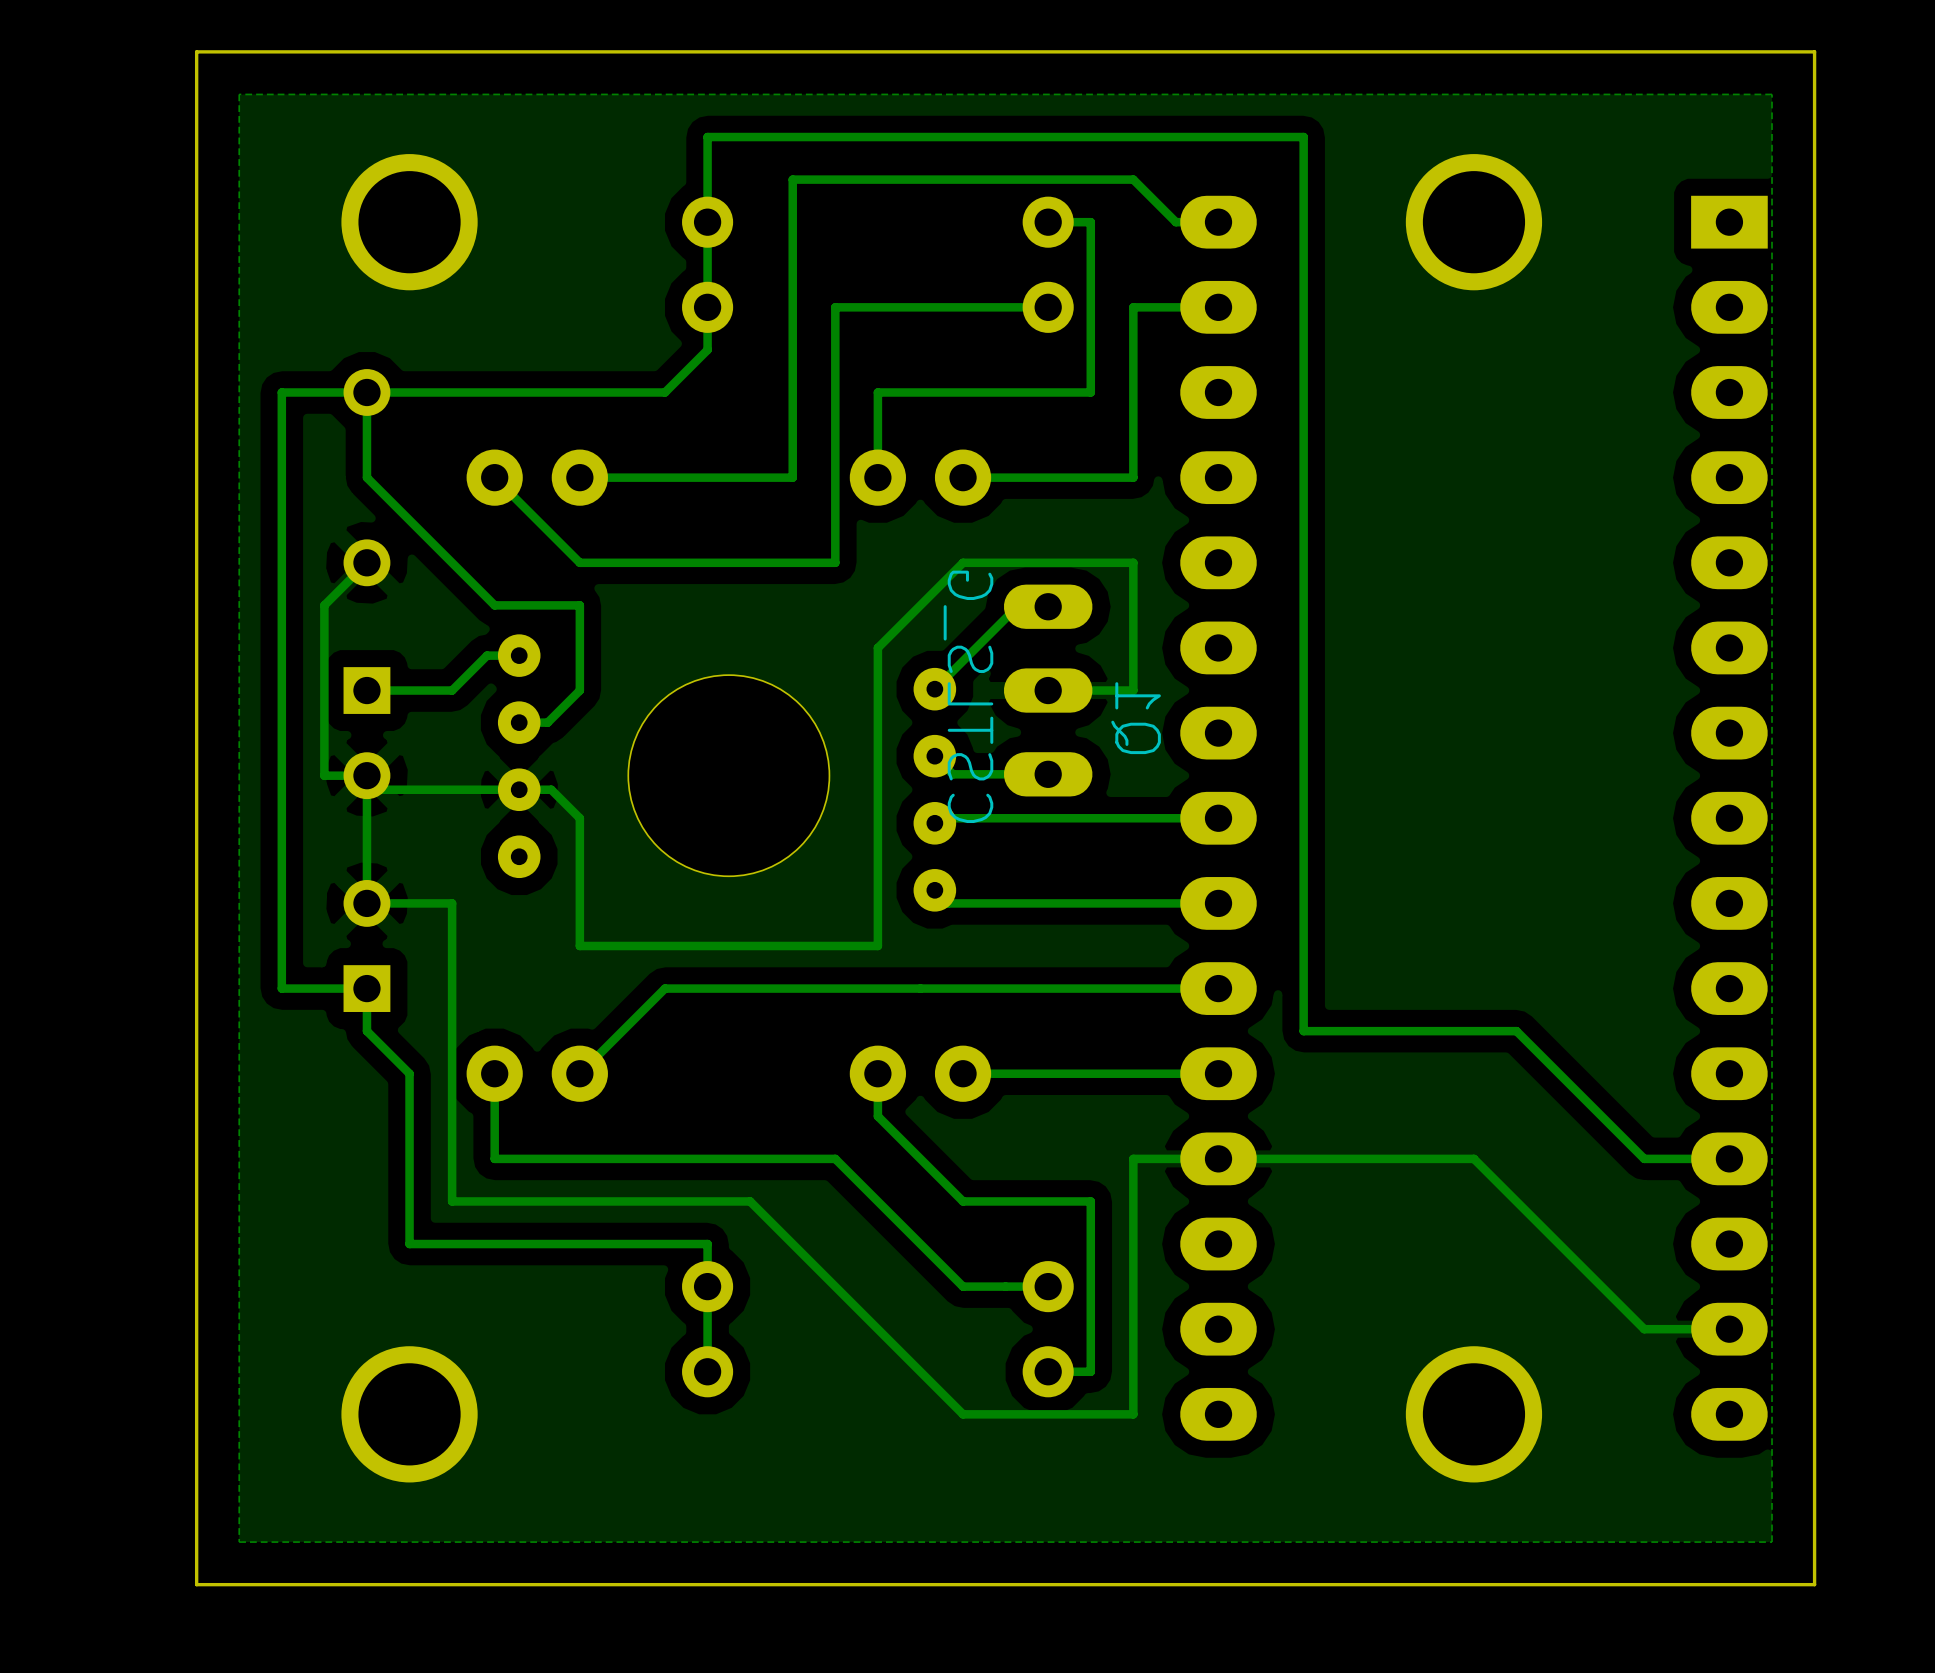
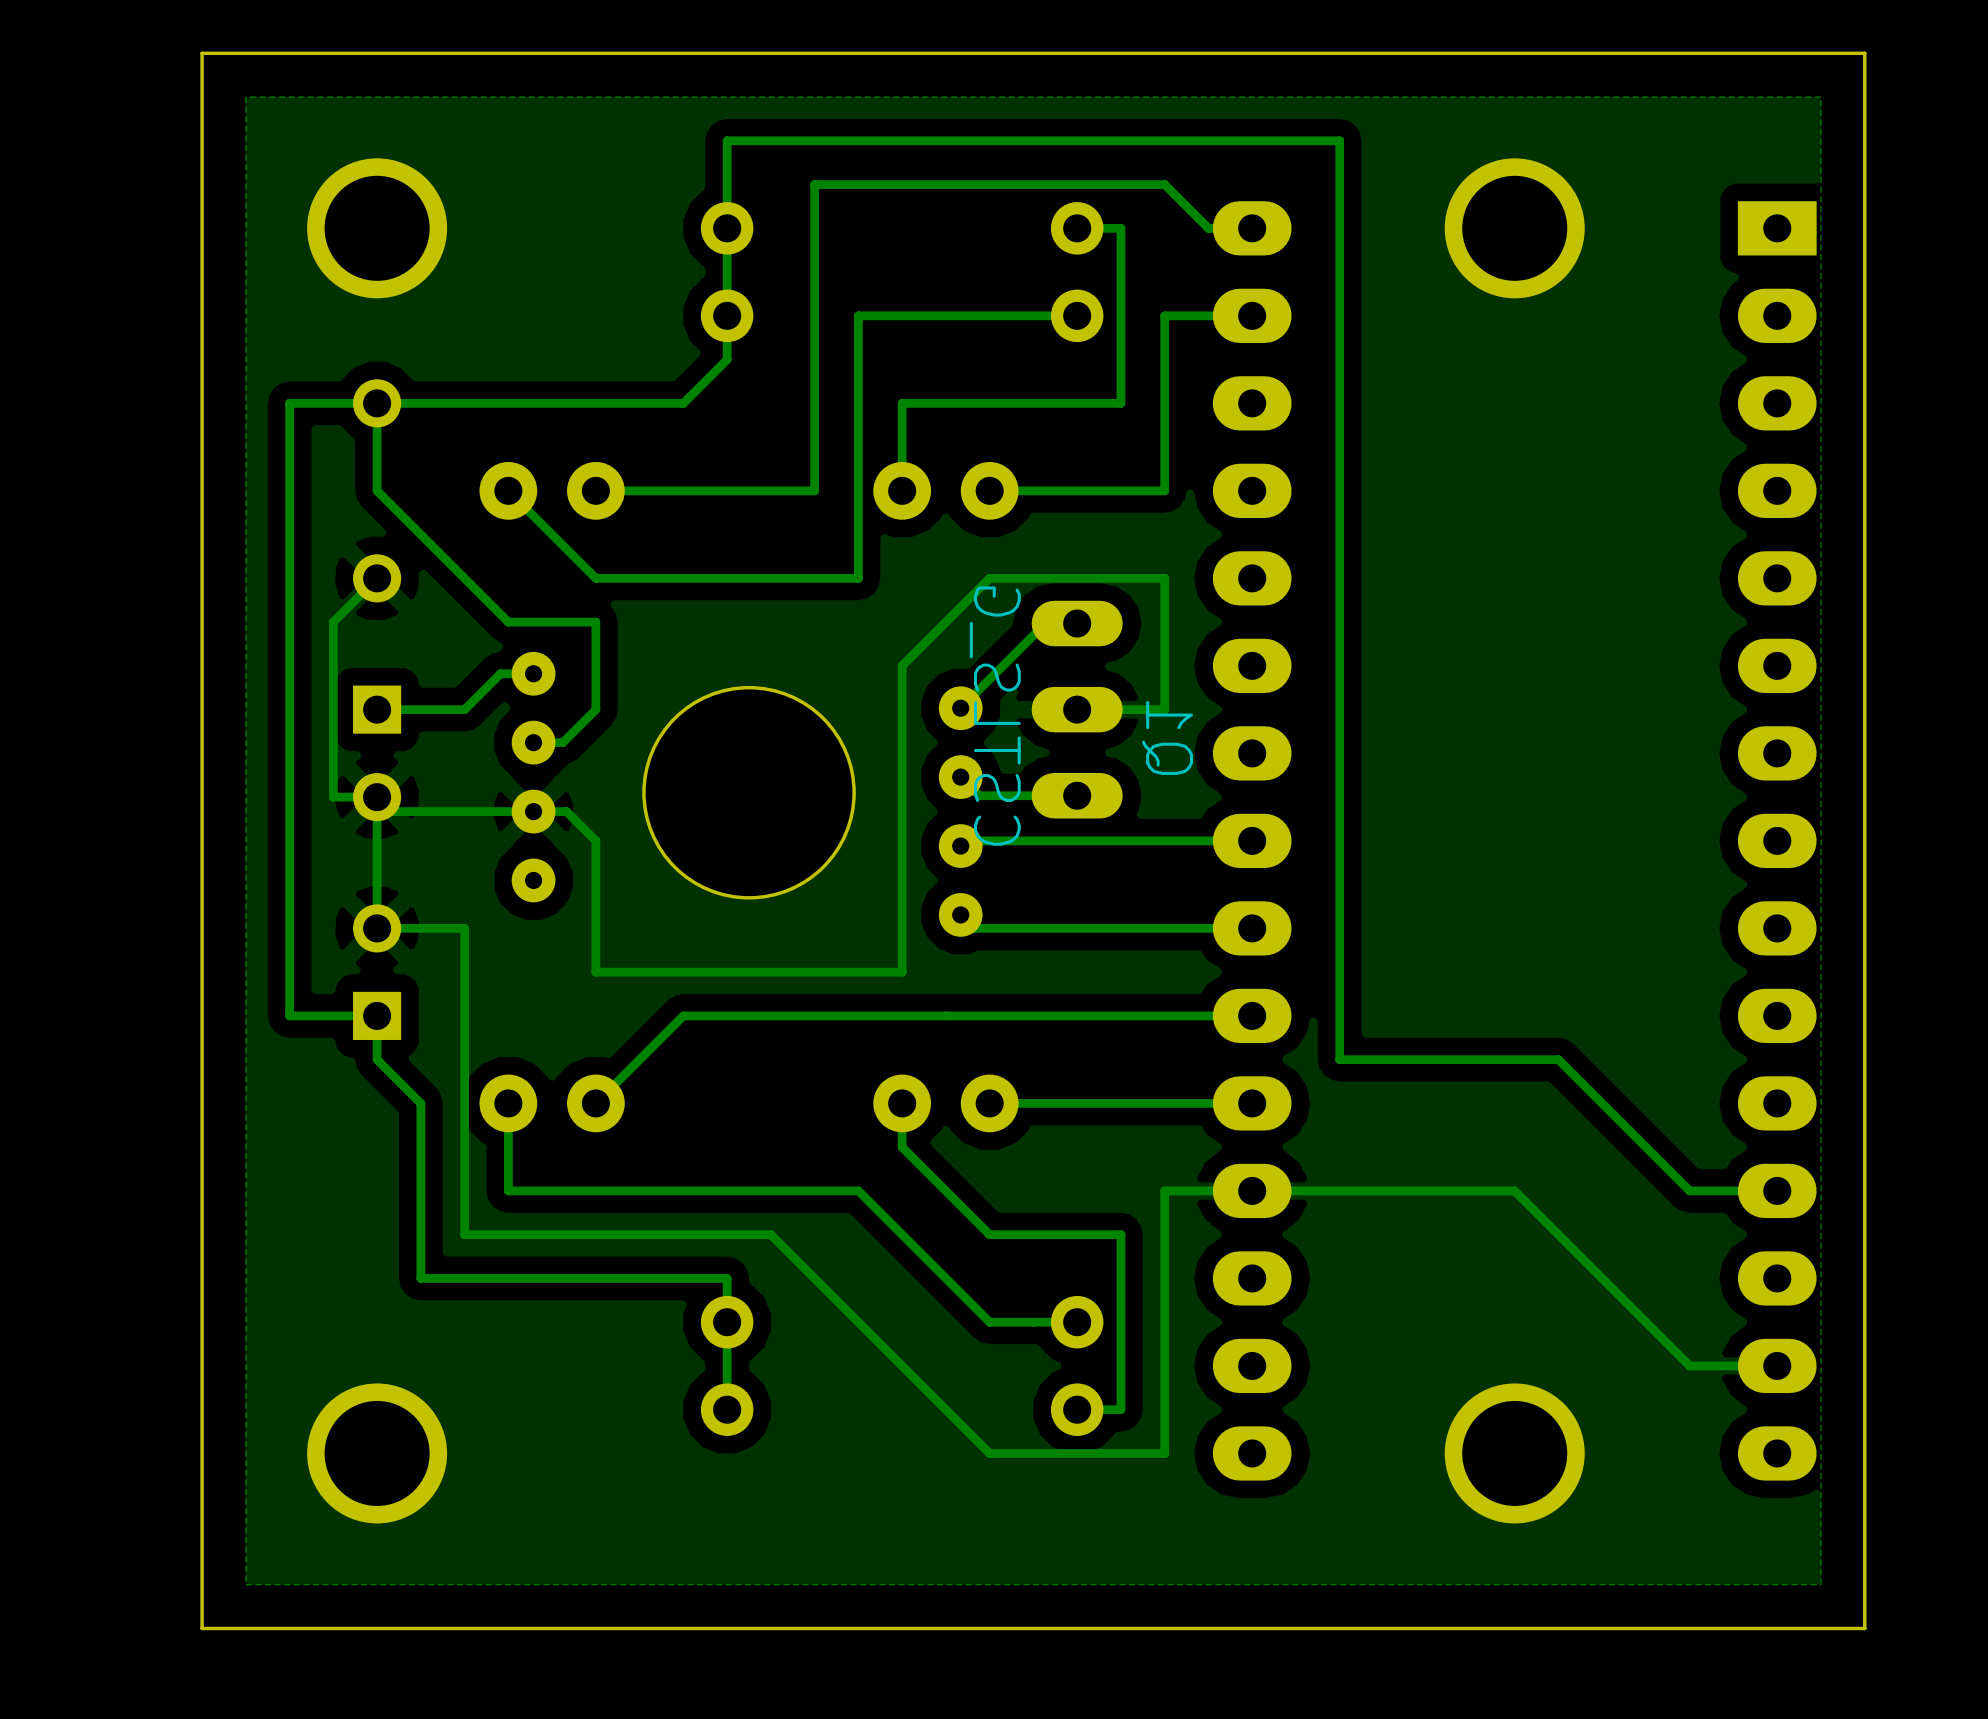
part position: (409, 222) -> (377, 228)
part footprint: [628, 675, 830, 877] -> [642, 685, 856, 900]
part position: (409, 1414) -> (377, 1453)

